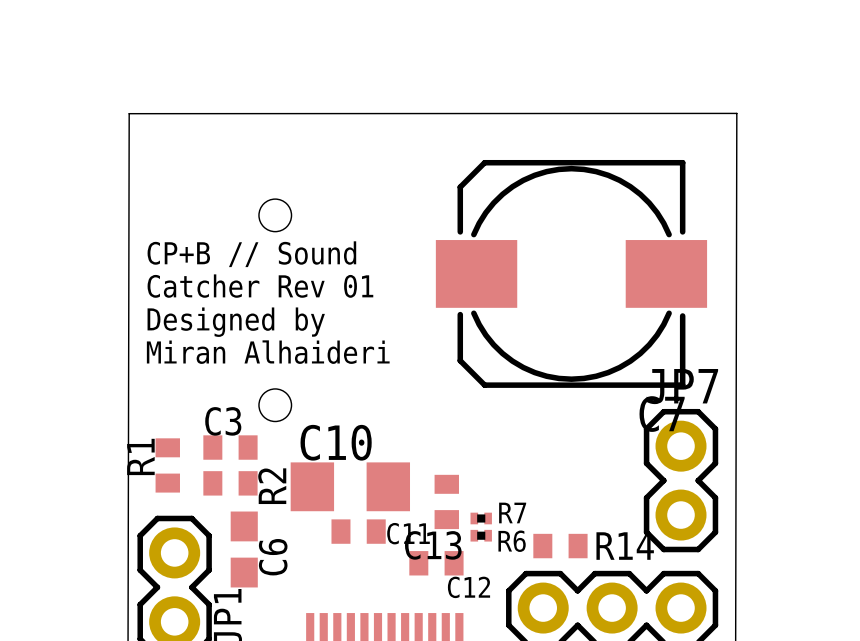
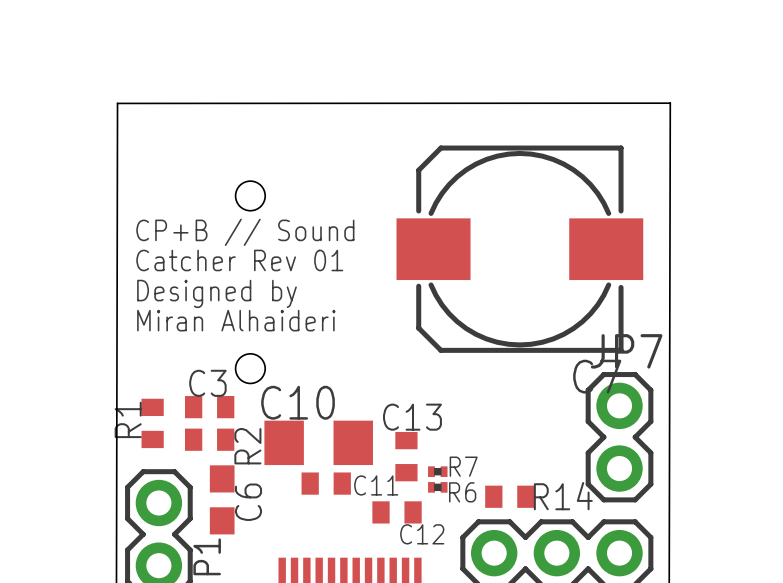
C13 name position: C13 (433, 545) -> C13 (412, 417)

